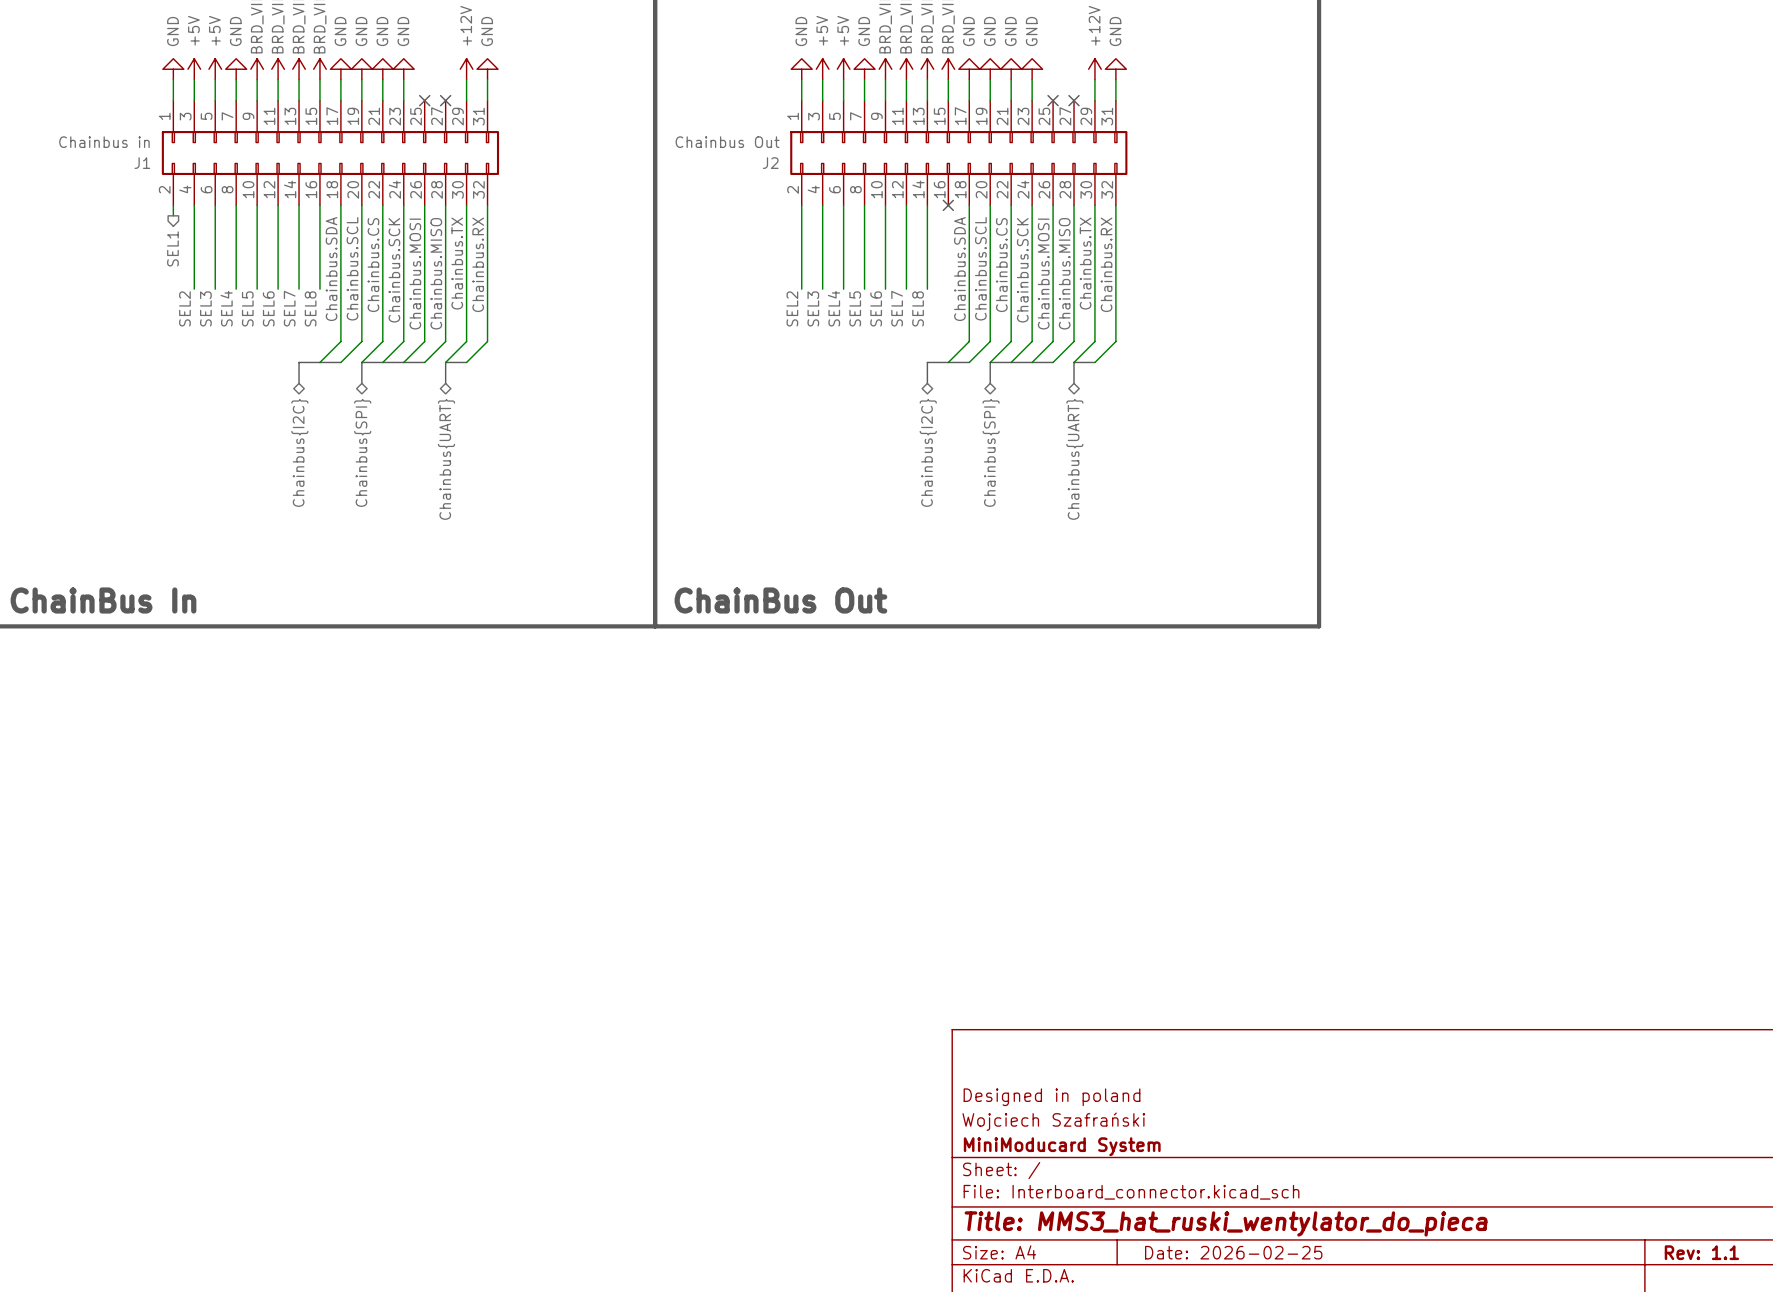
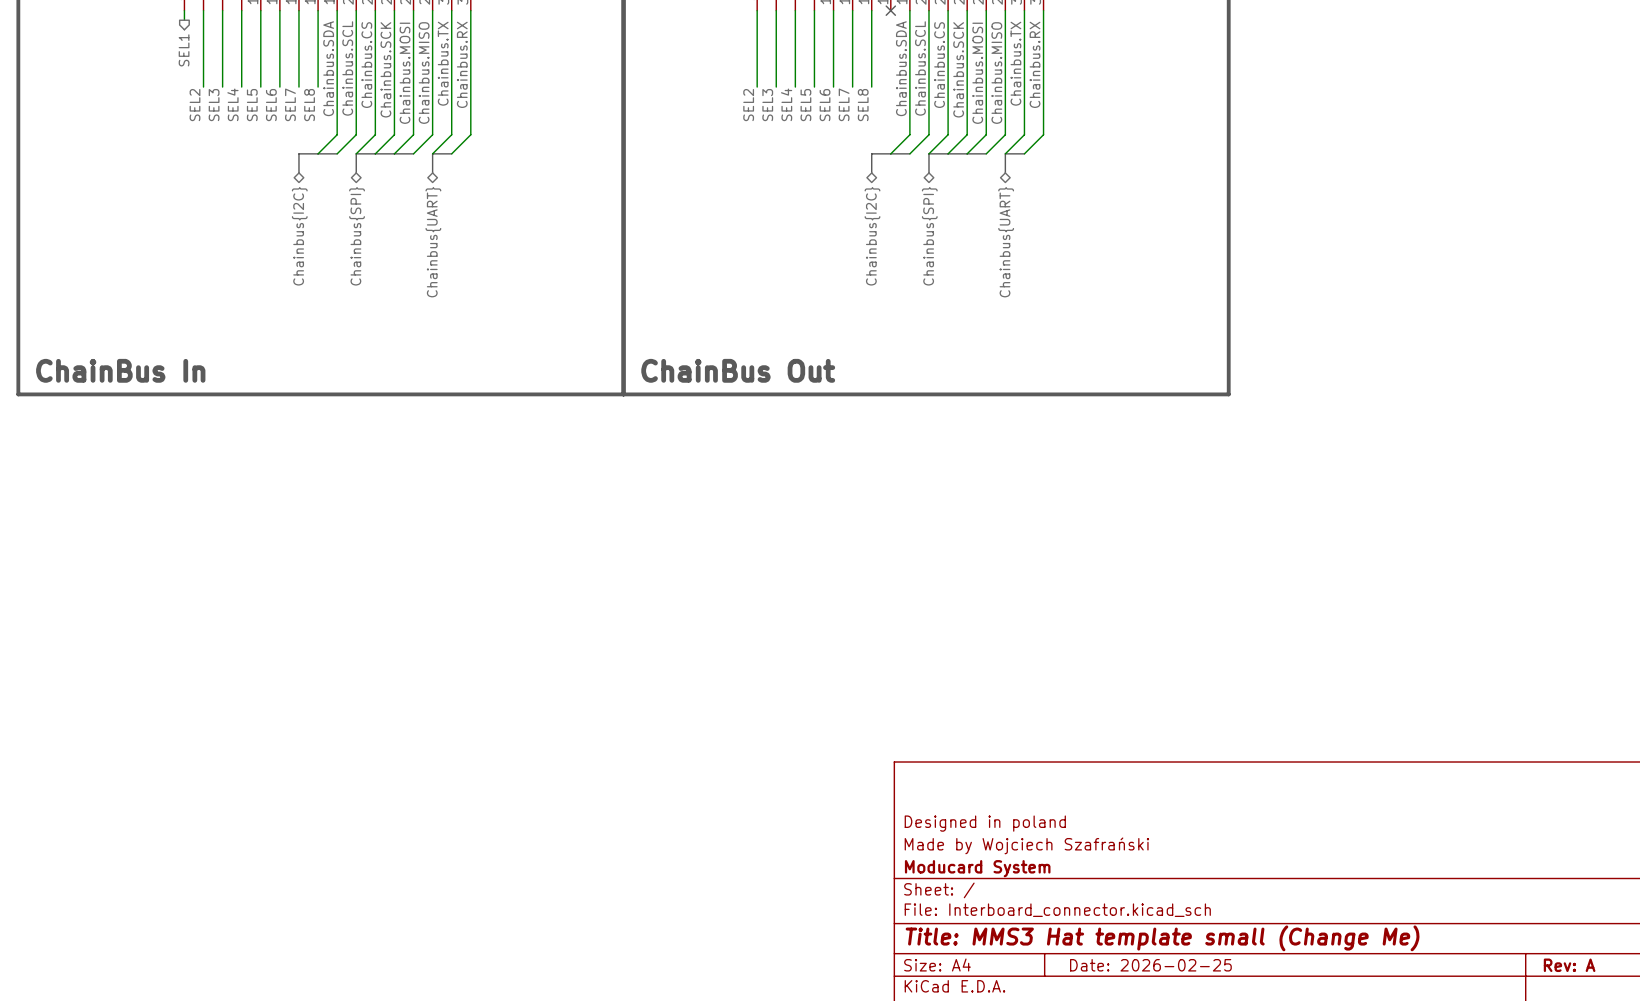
title block: Wojciech Szafrański (1053, 1121) -> Made by Wojciech Szafrański (1026, 845)
title block: MiniModucard System (1062, 1146) -> Moducard System (977, 868)
title block: Title: MMS3_hat_ruski_wentylator_do_pieca (1226, 1223) -> Title: MMS3 Hat template small (Change Me) (1162, 938)
title block: Rev: 1.1 (1701, 1252) -> Rev: A (1569, 965)

